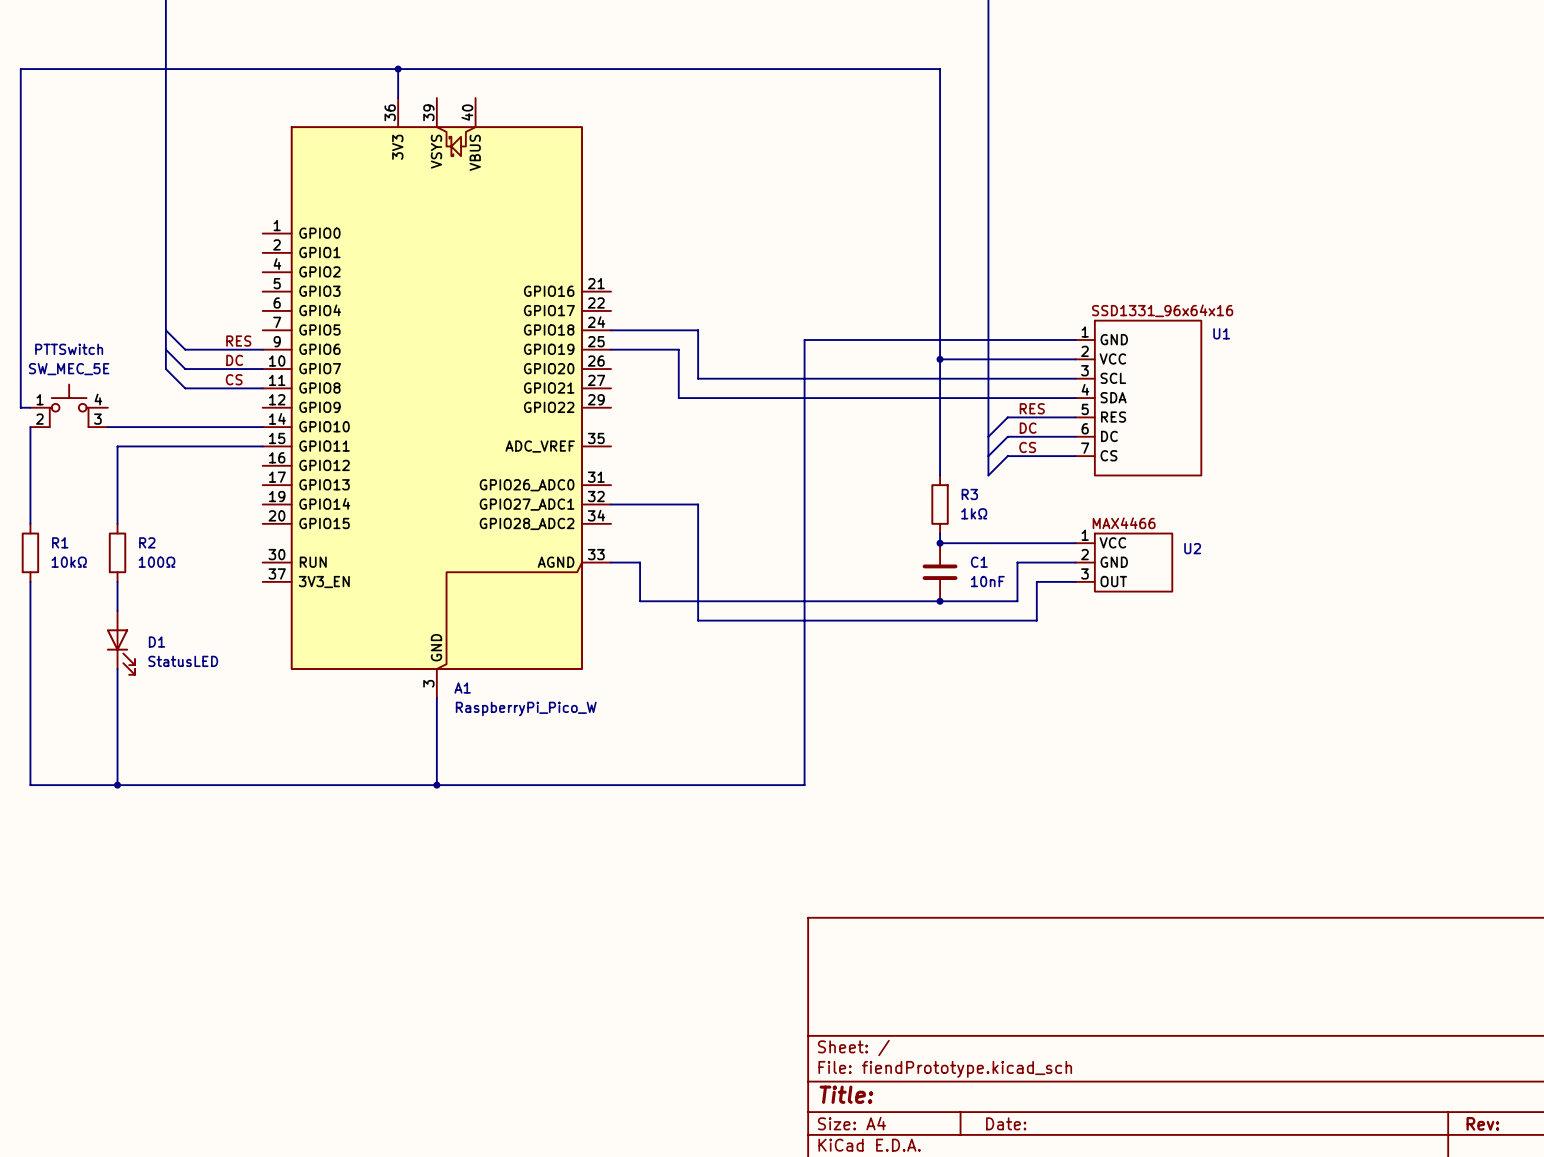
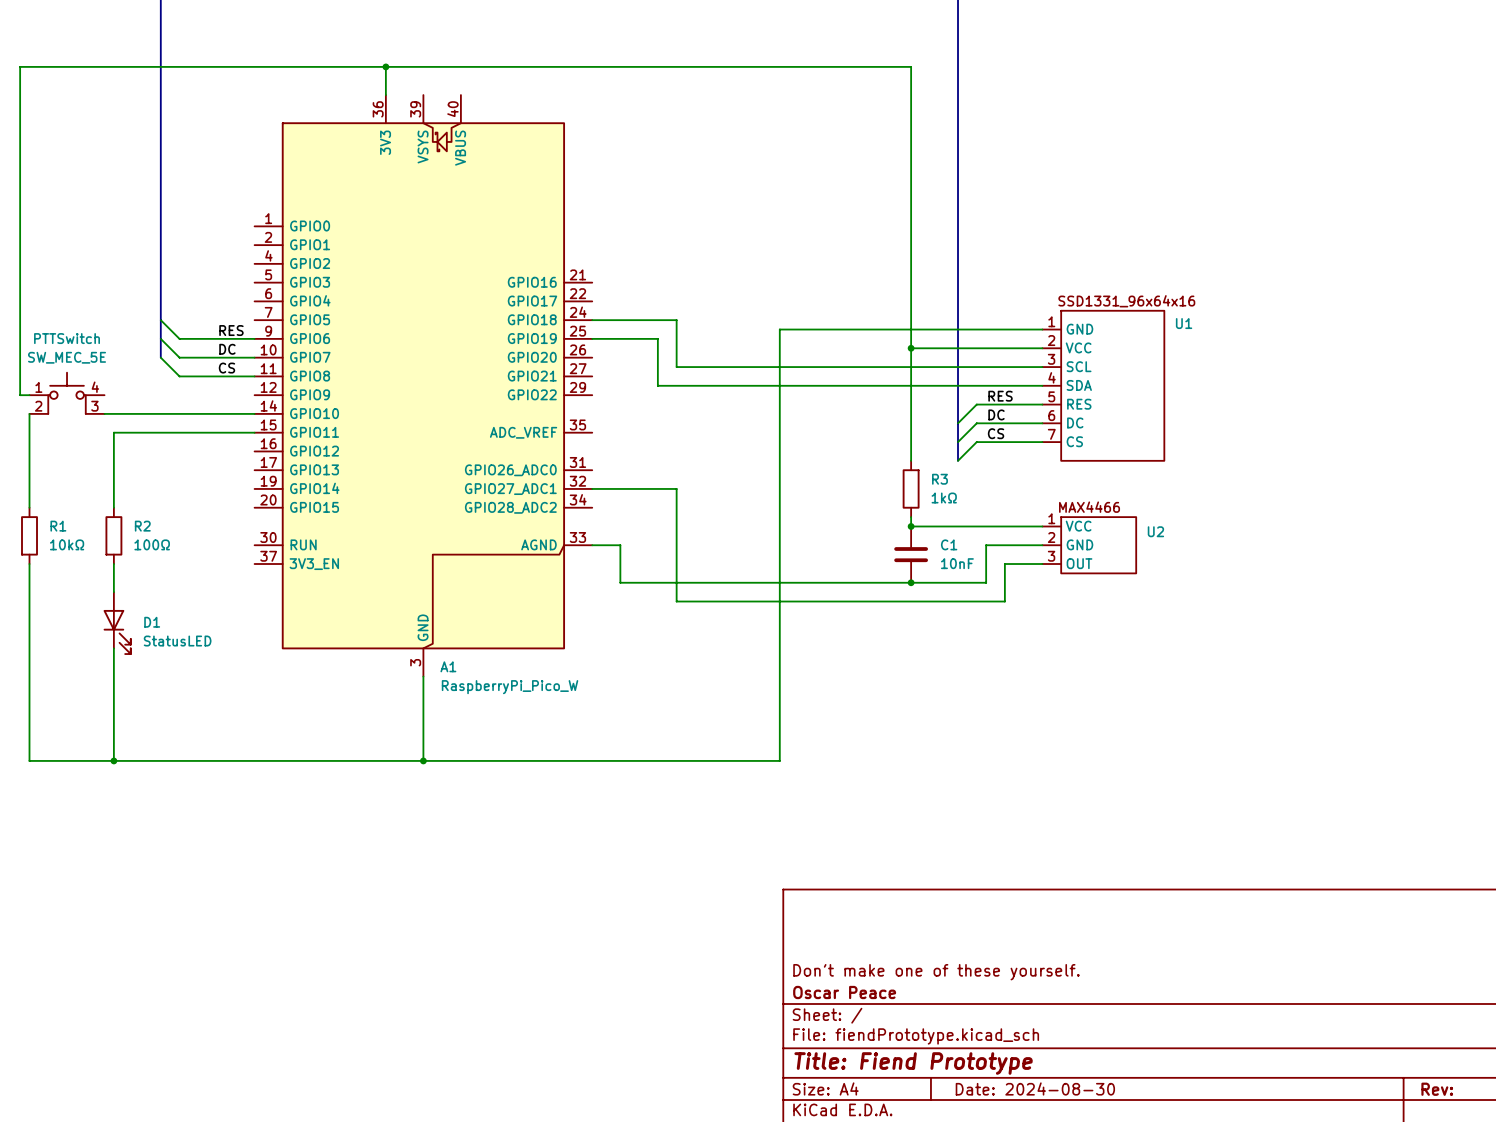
title block: none -> Don't make one of these yourself. (936, 972)
title block: none -> Oscar Peace (844, 992)
title block: Title: (846, 1094) -> Title: Fiend Prototype (913, 1063)
title block: Date: (1006, 1123) -> Date: 2024-08-30 (1035, 1088)

